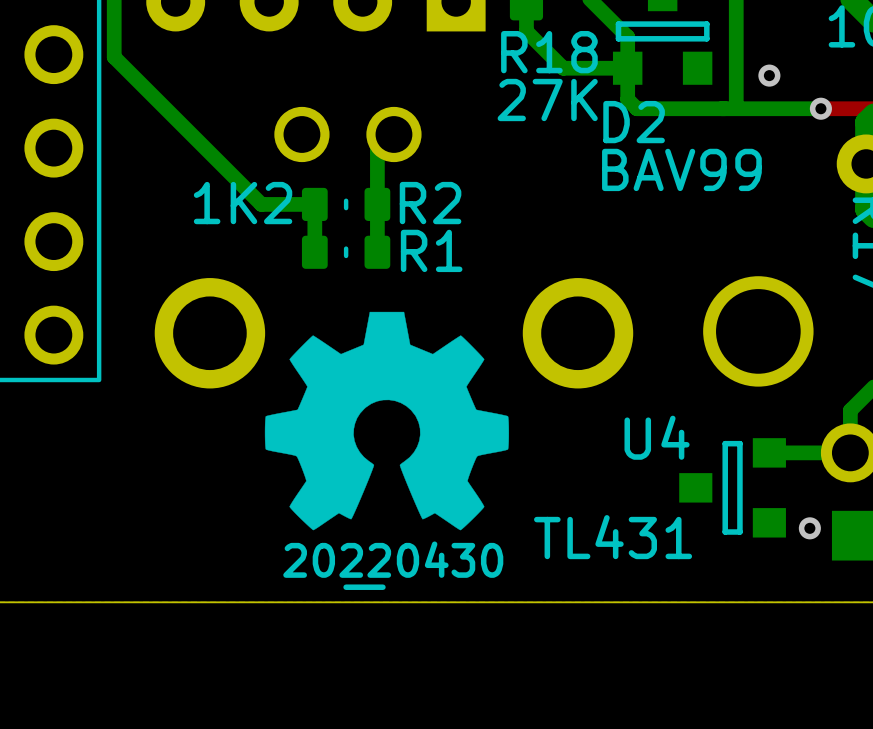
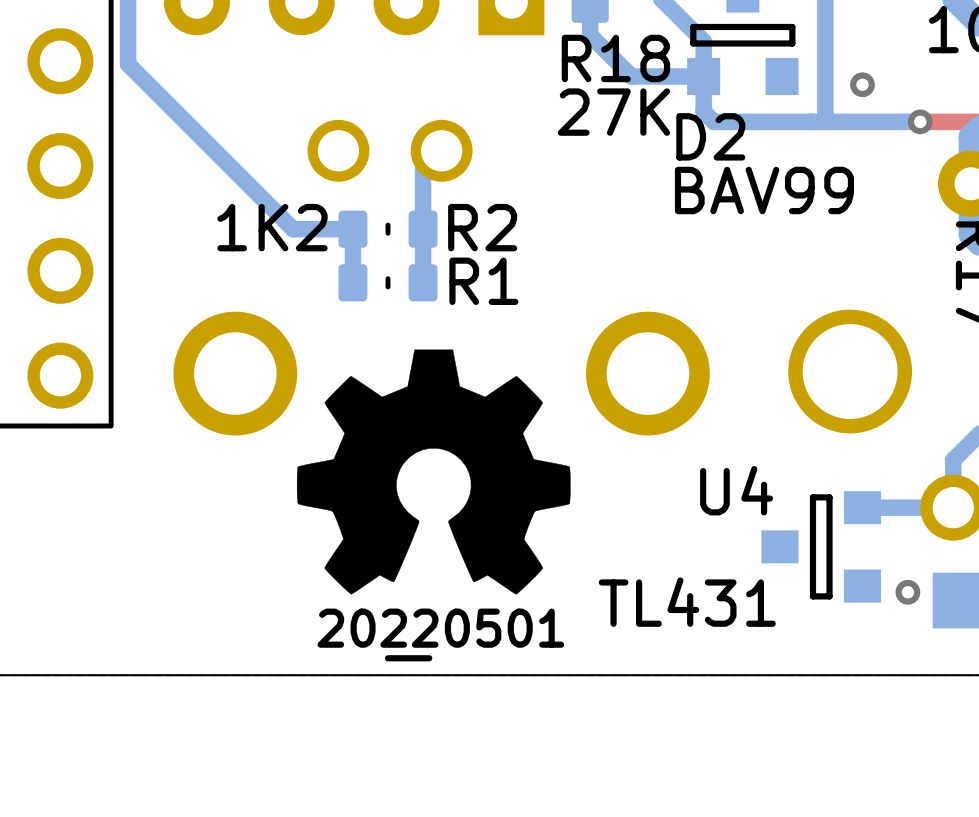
drawing shape: [283, 541, 504, 590] -> [317, 608, 565, 662]

